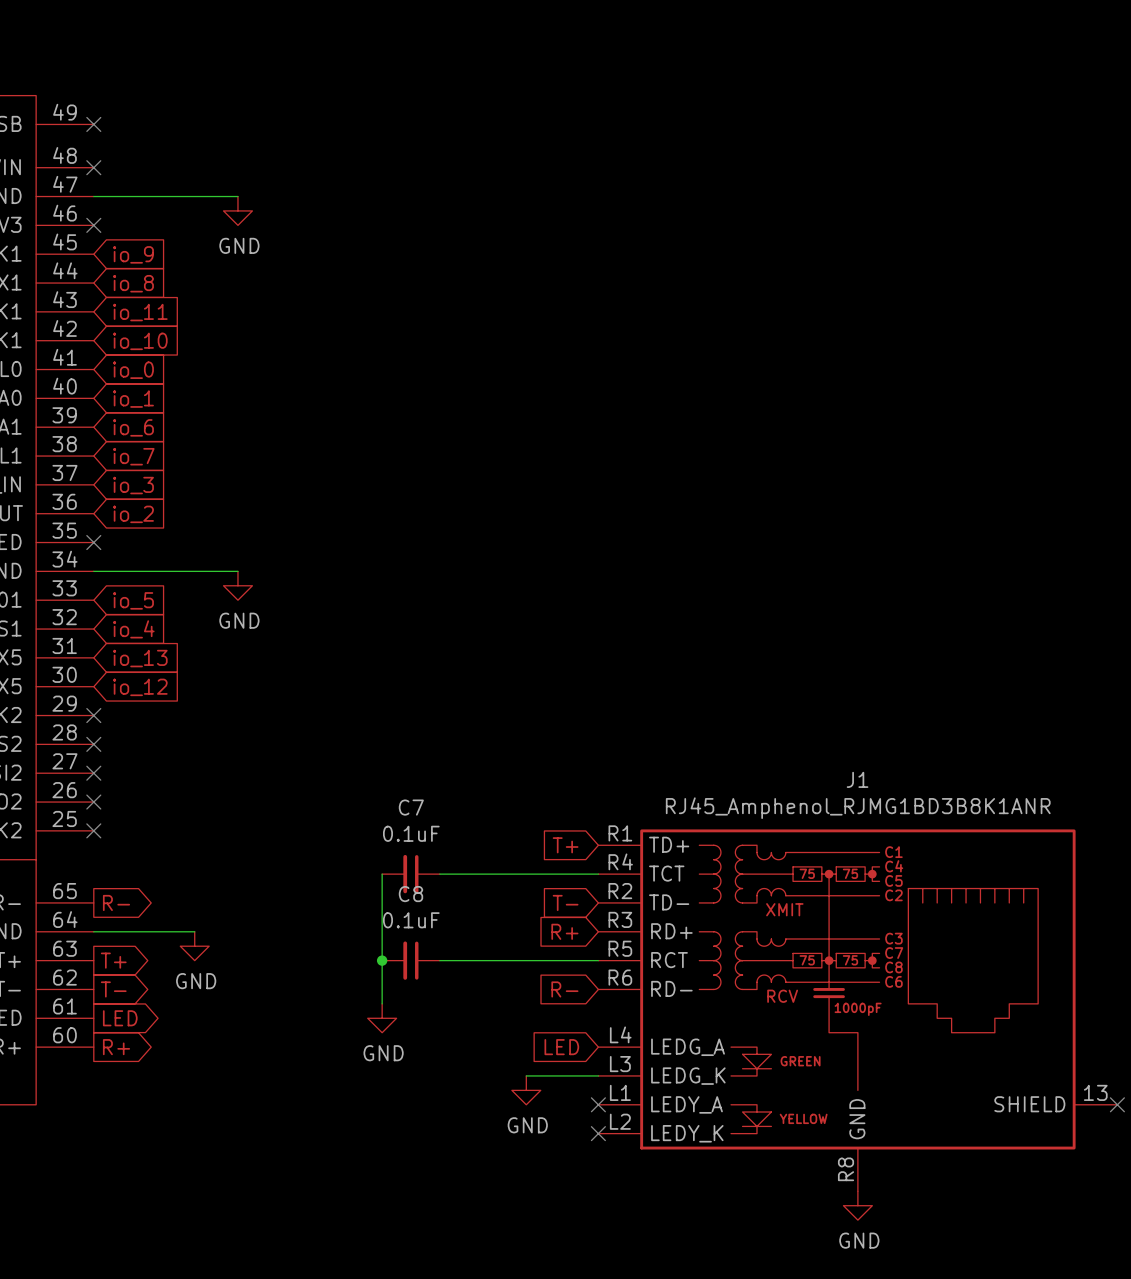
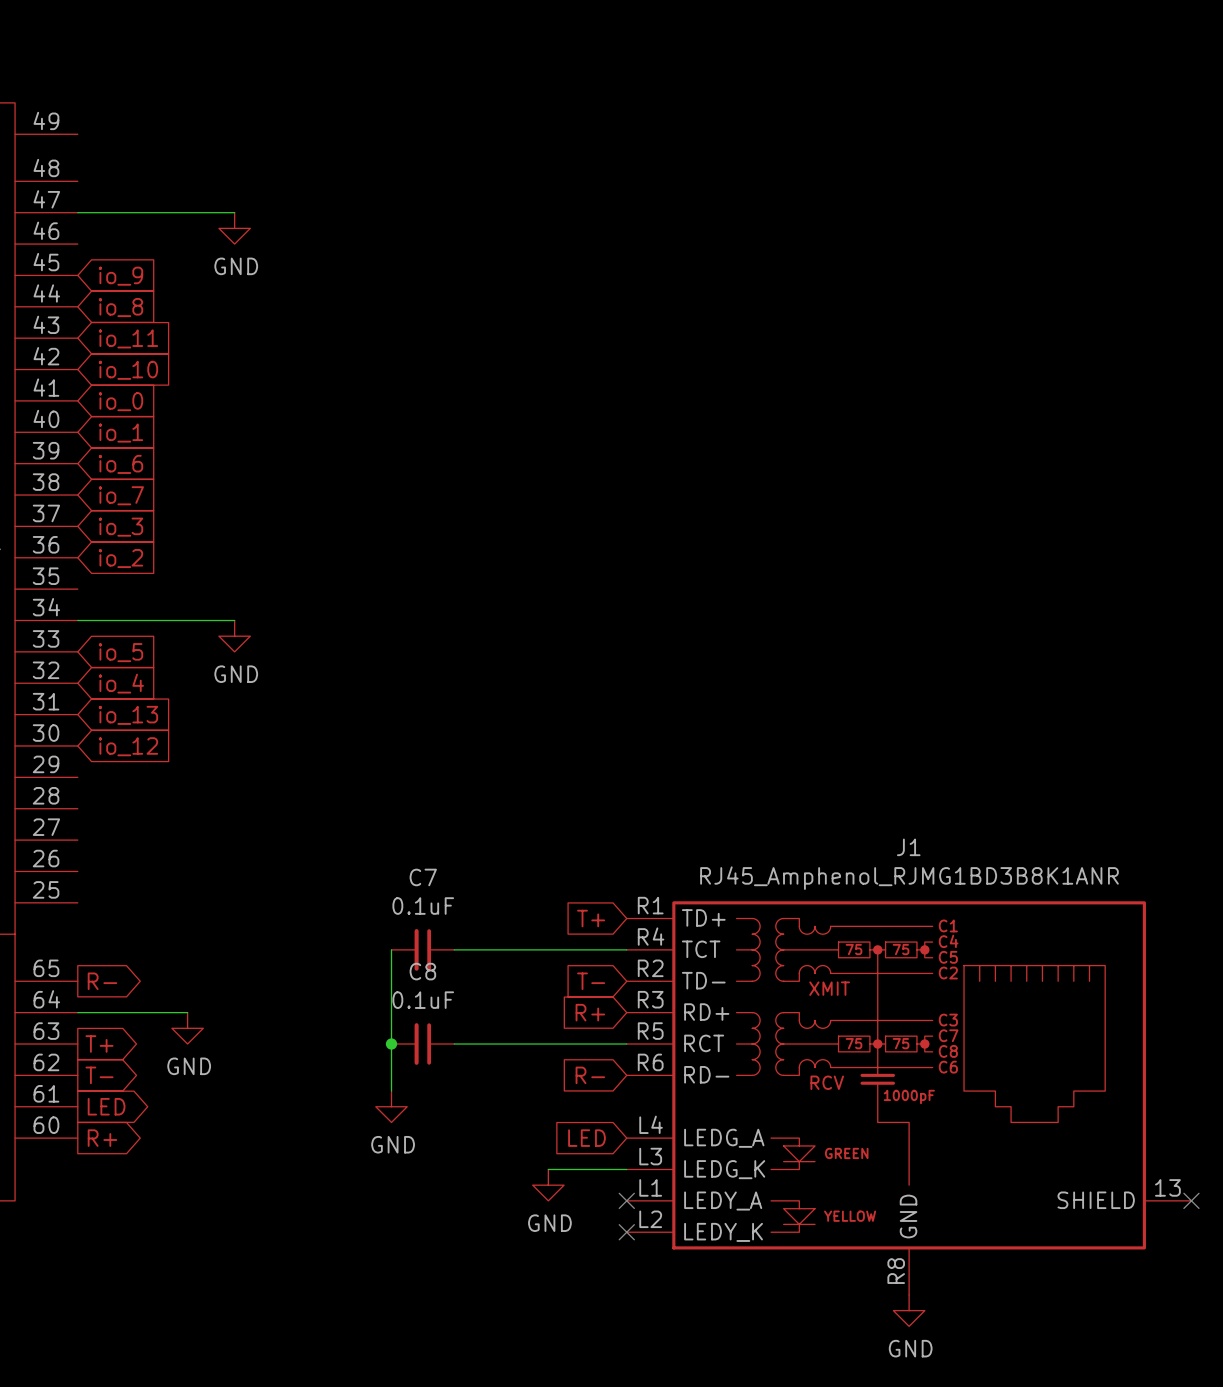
no-connect mark: (93, 124) -> none
no-connect mark: (93, 167) -> none
no-connect mark: (93, 225) -> none
no-connect mark: (93, 542) -> none
no-connect mark: (93, 715) -> none
no-connect mark: (93, 744) -> none
no-connect mark: (93, 773) -> none
no-connect mark: (93, 802) -> none
no-connect mark: (93, 830) -> none

